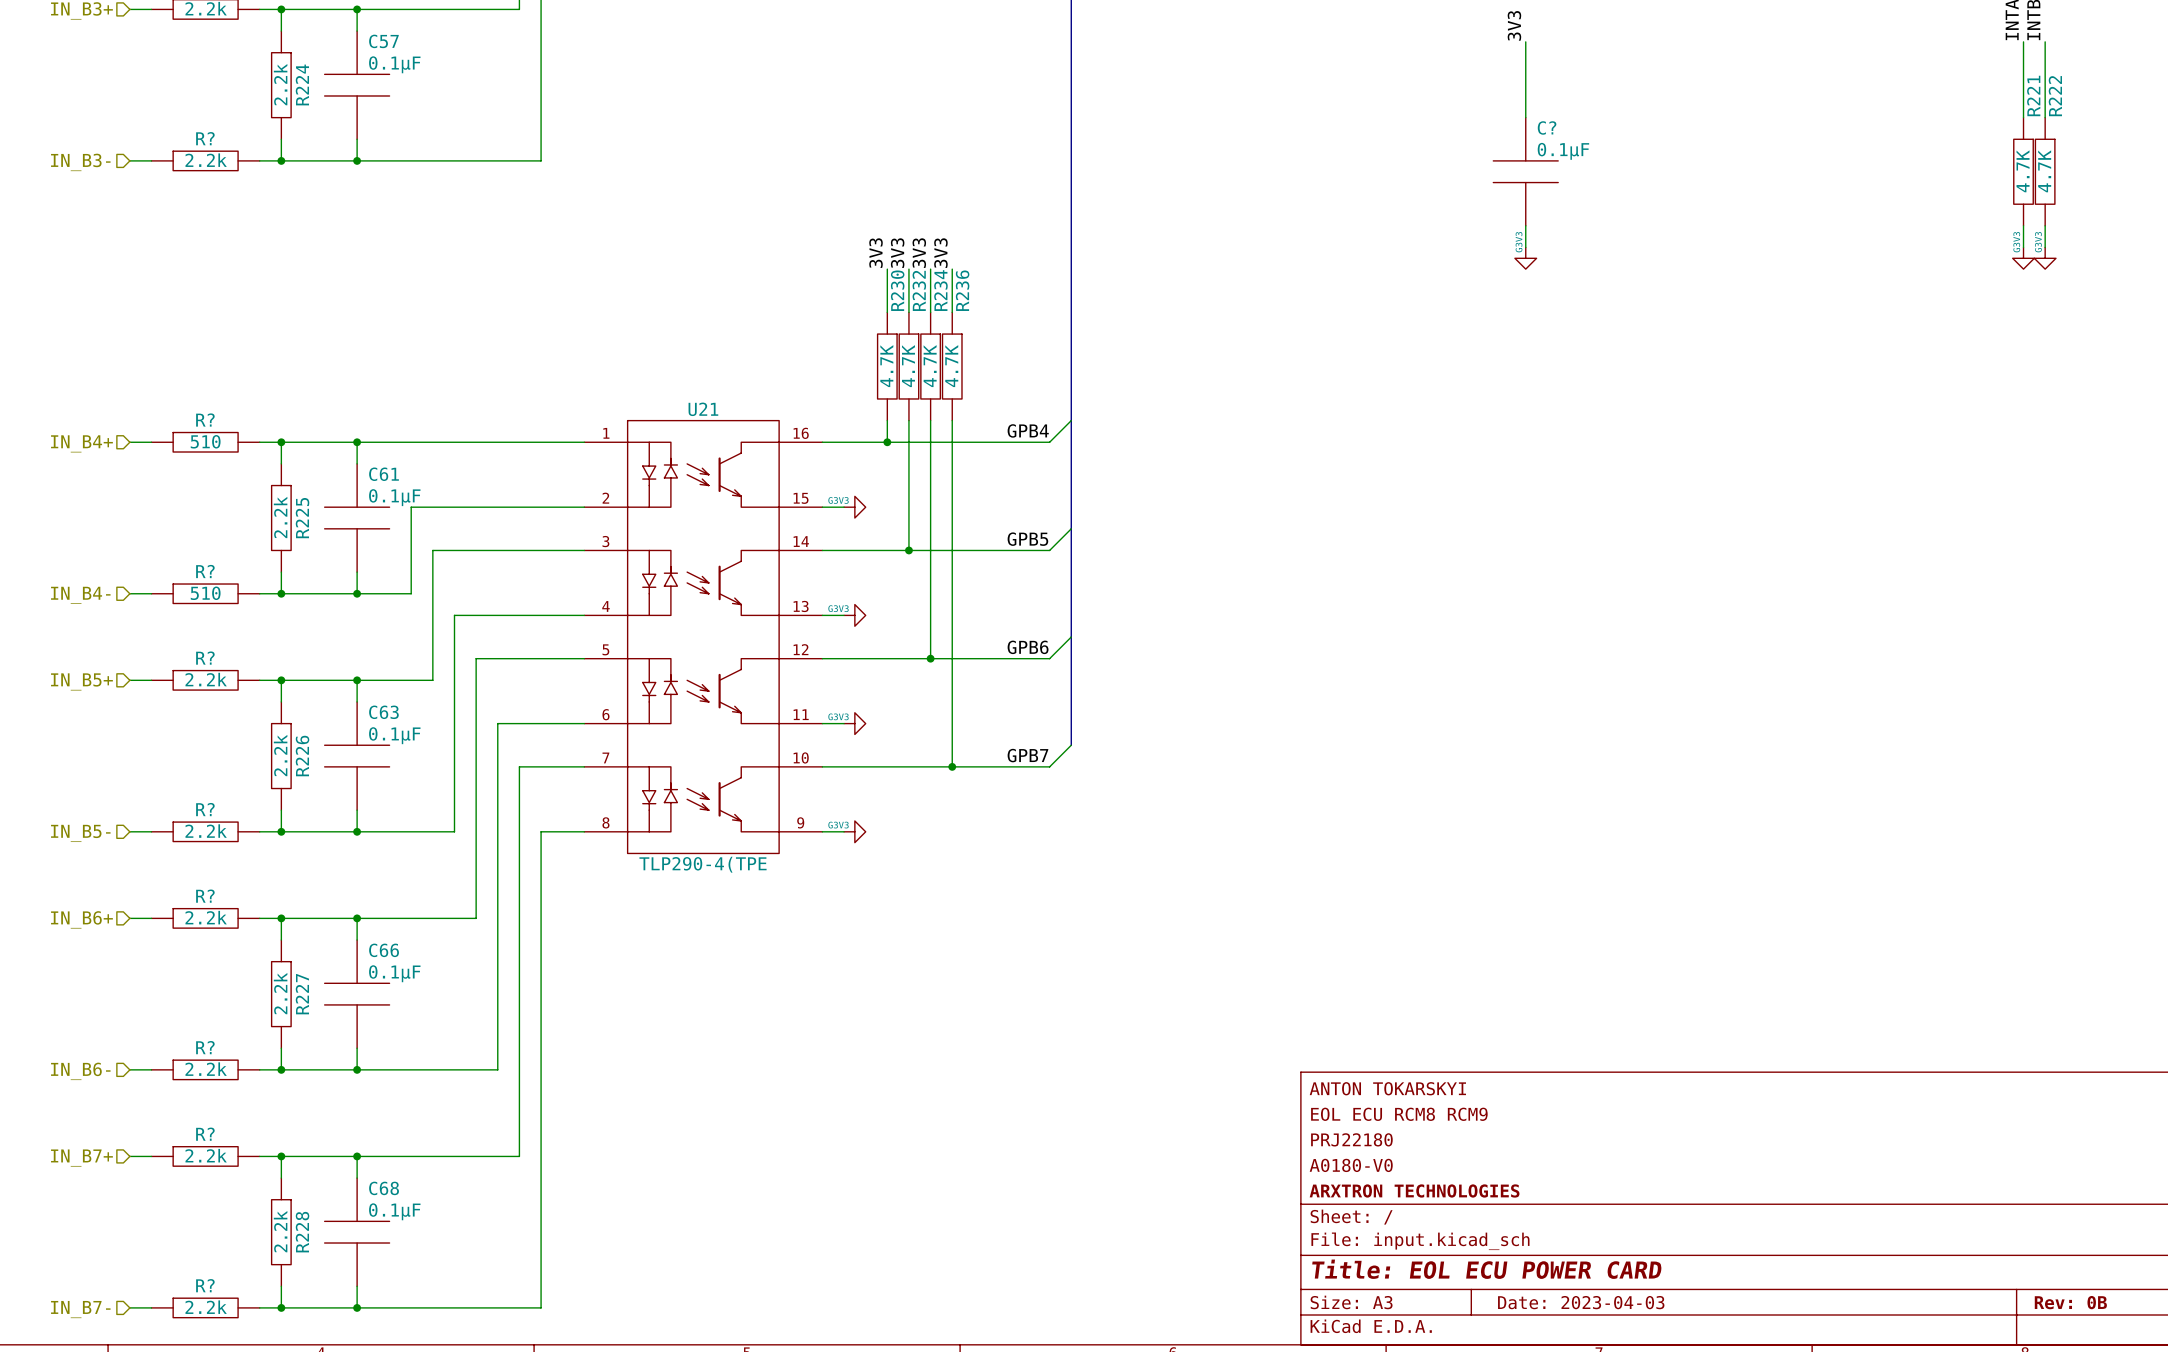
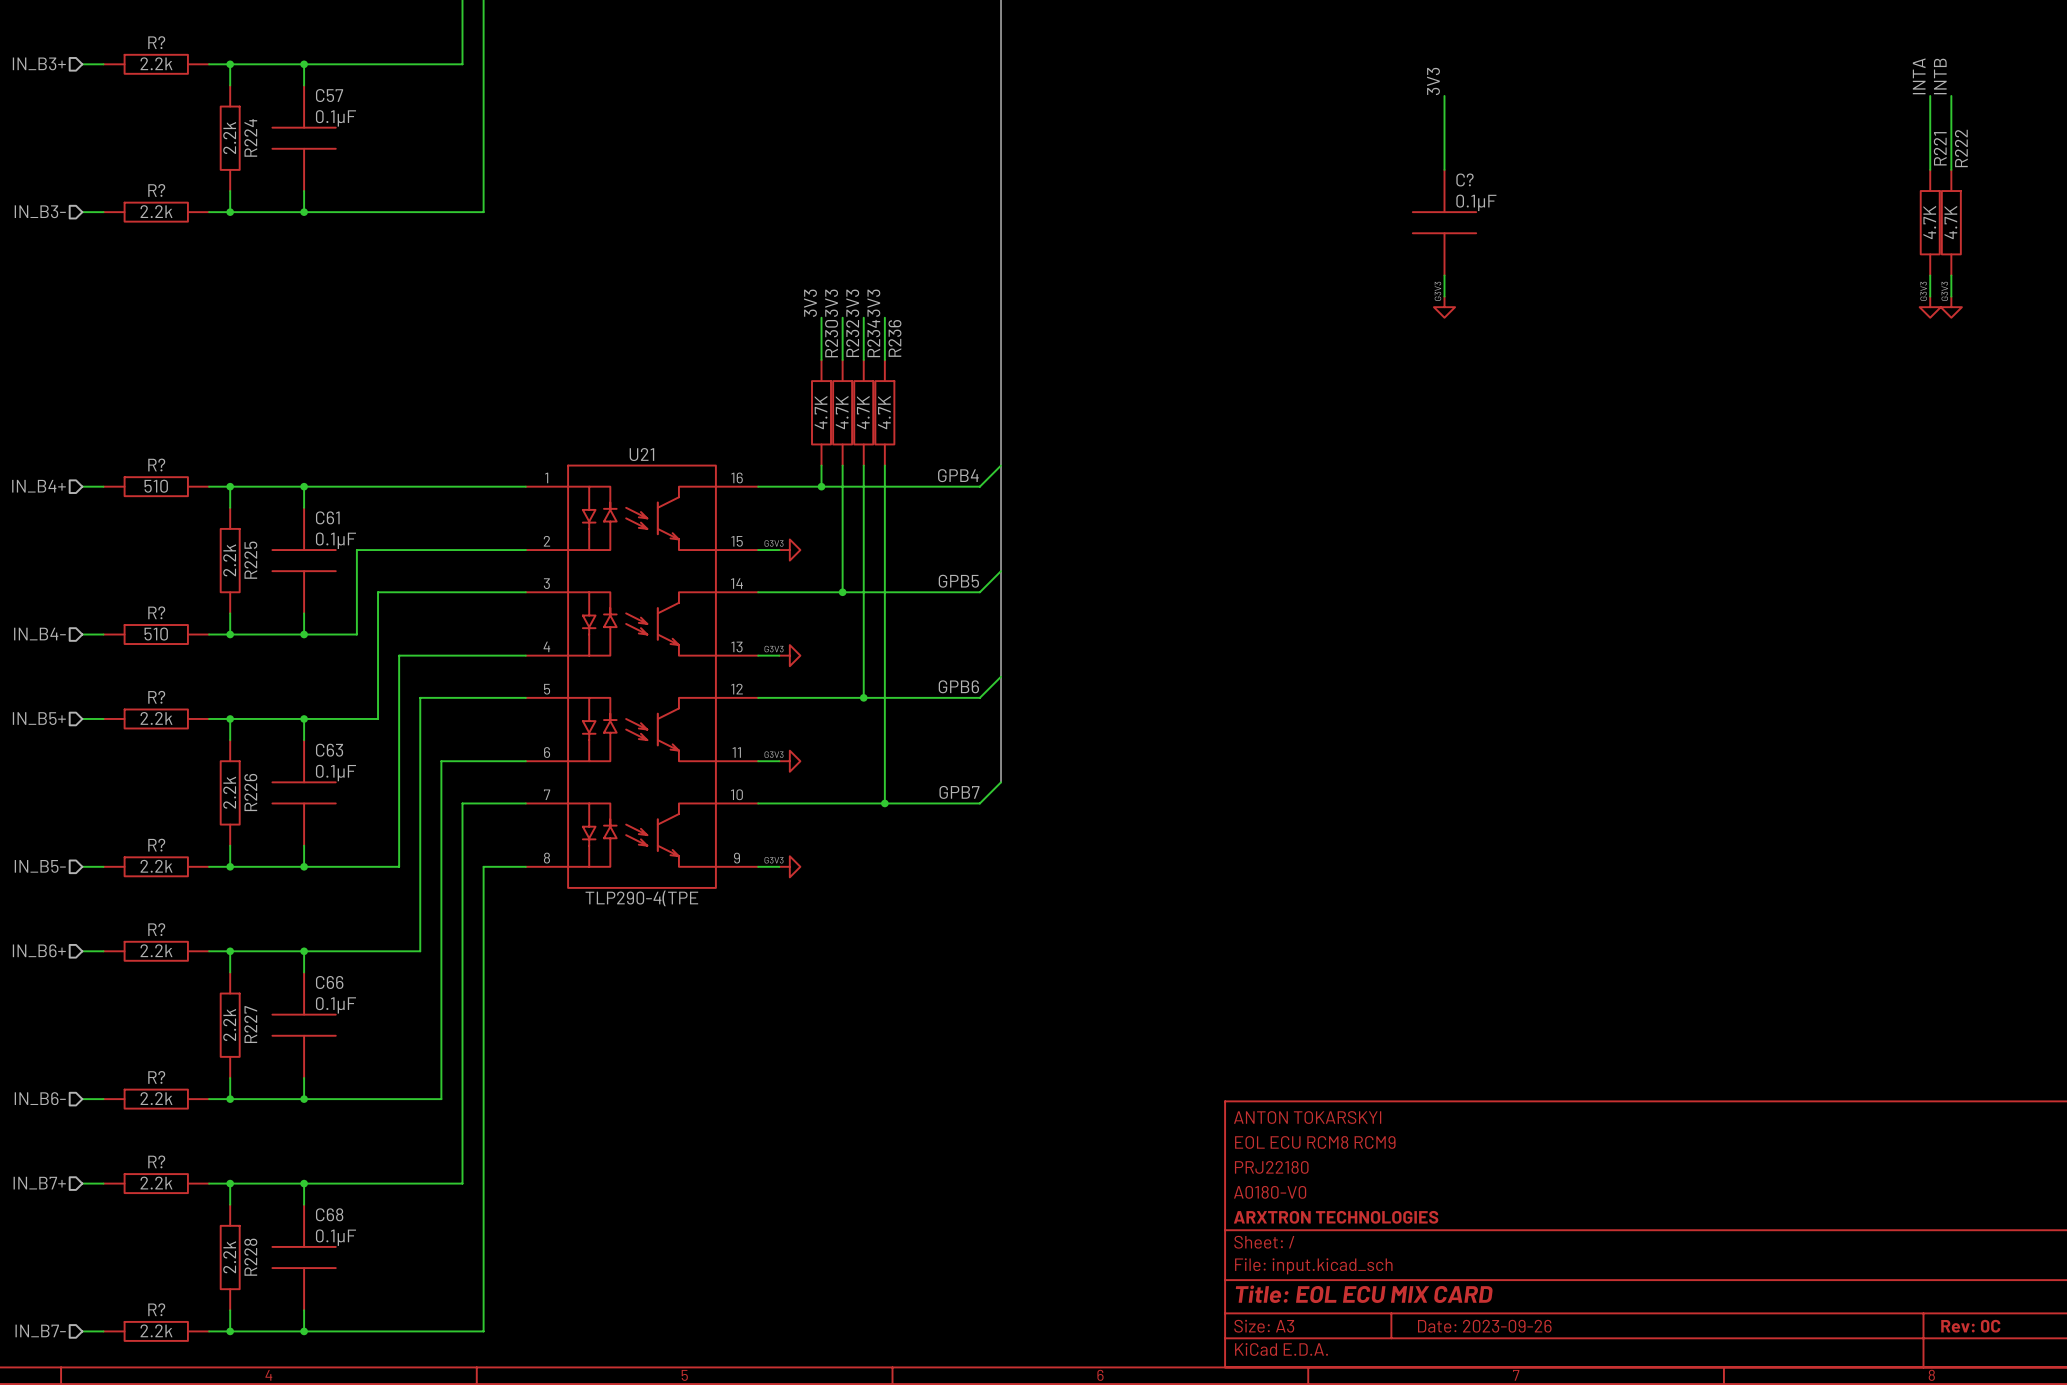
title block: Title: EOL ECU POWER CARD (1487, 1269) -> Title: EOL ECU MIX CARD (1364, 1294)
title block: Date: 2023-04-03 (1581, 1302) -> Date: 2023-09-26 (1484, 1326)
title block: Rev: 0B (2070, 1302) -> Rev: 0C (1970, 1326)

